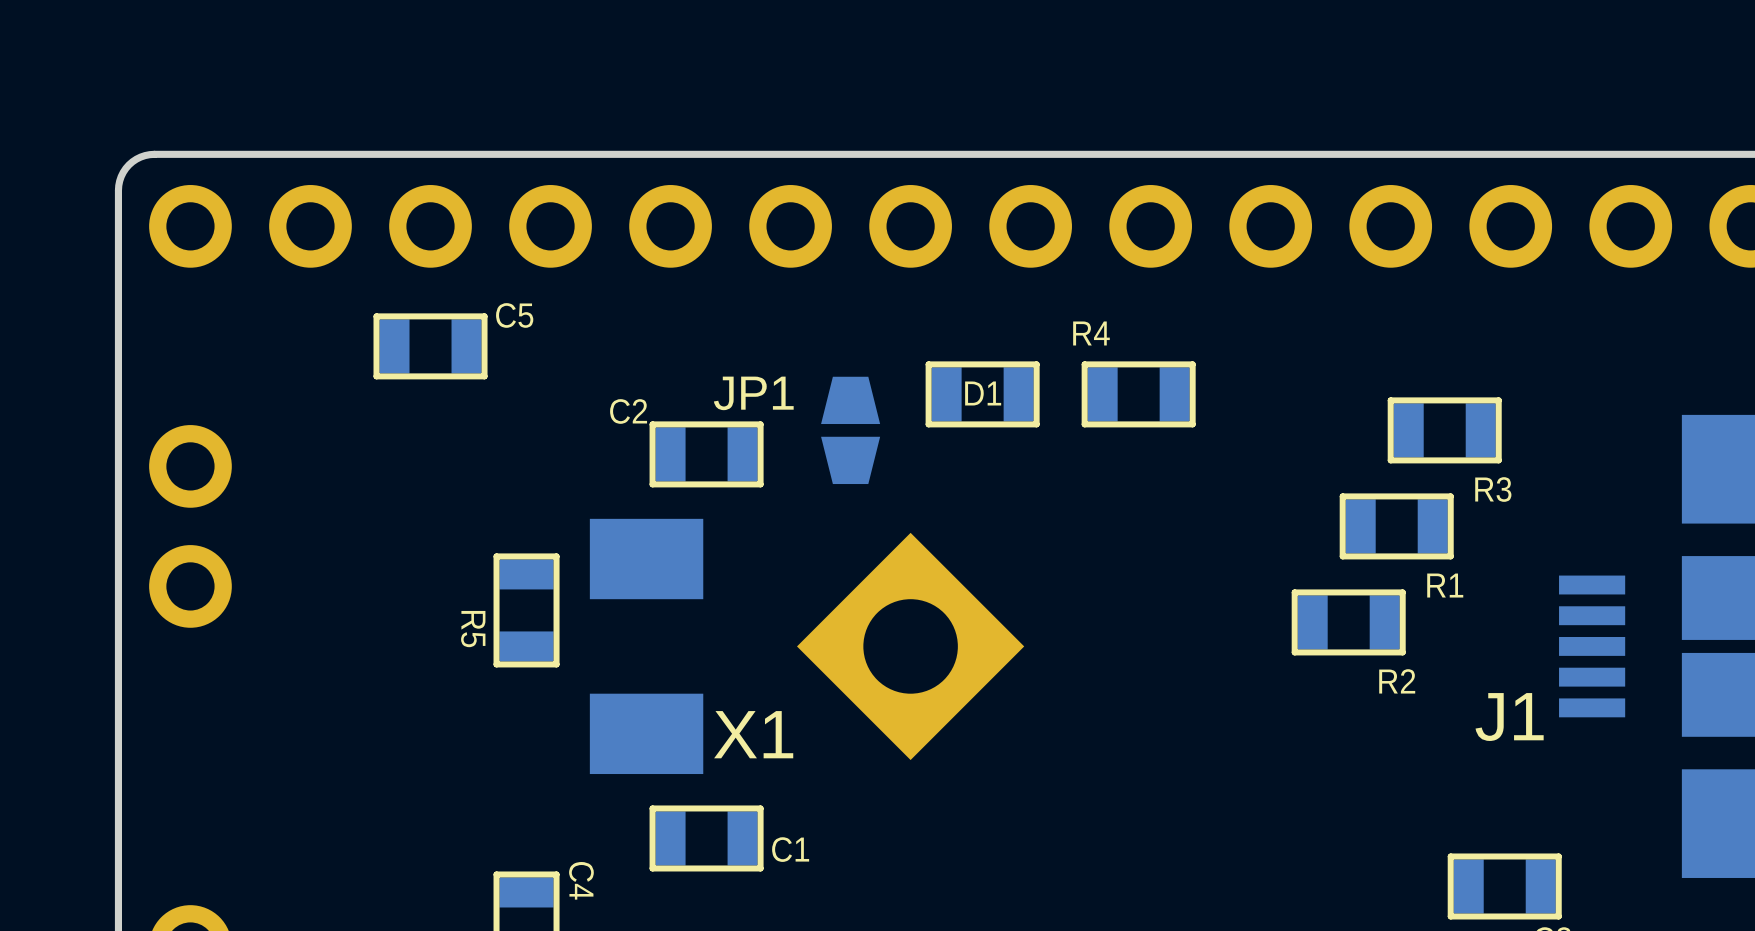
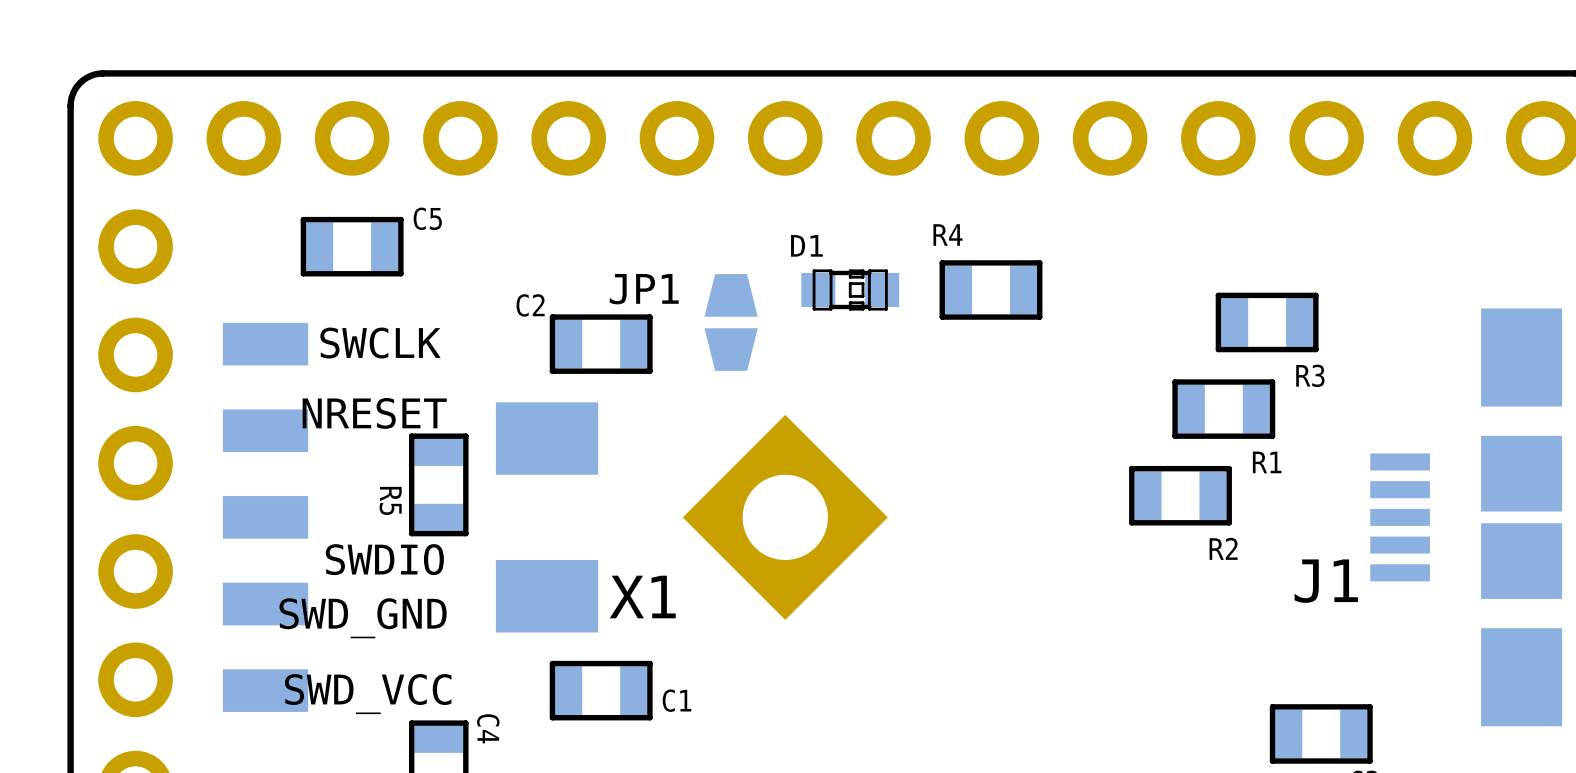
part: none -> (135, 246)
D1 footprint: [925, 361, 1040, 428] -> [801, 269, 900, 311]
D1 name position: D1 (983, 393) -> D1 (806, 245)
part: none -> SWCLK (265, 344)
part: none -> NRESET (265, 430)
part: none -> SWDIO (265, 517)
part: none -> (135, 571)
part: none -> SWD_GND (265, 604)
part: none -> (135, 679)
part: none -> SWD_VCC (265, 690)

